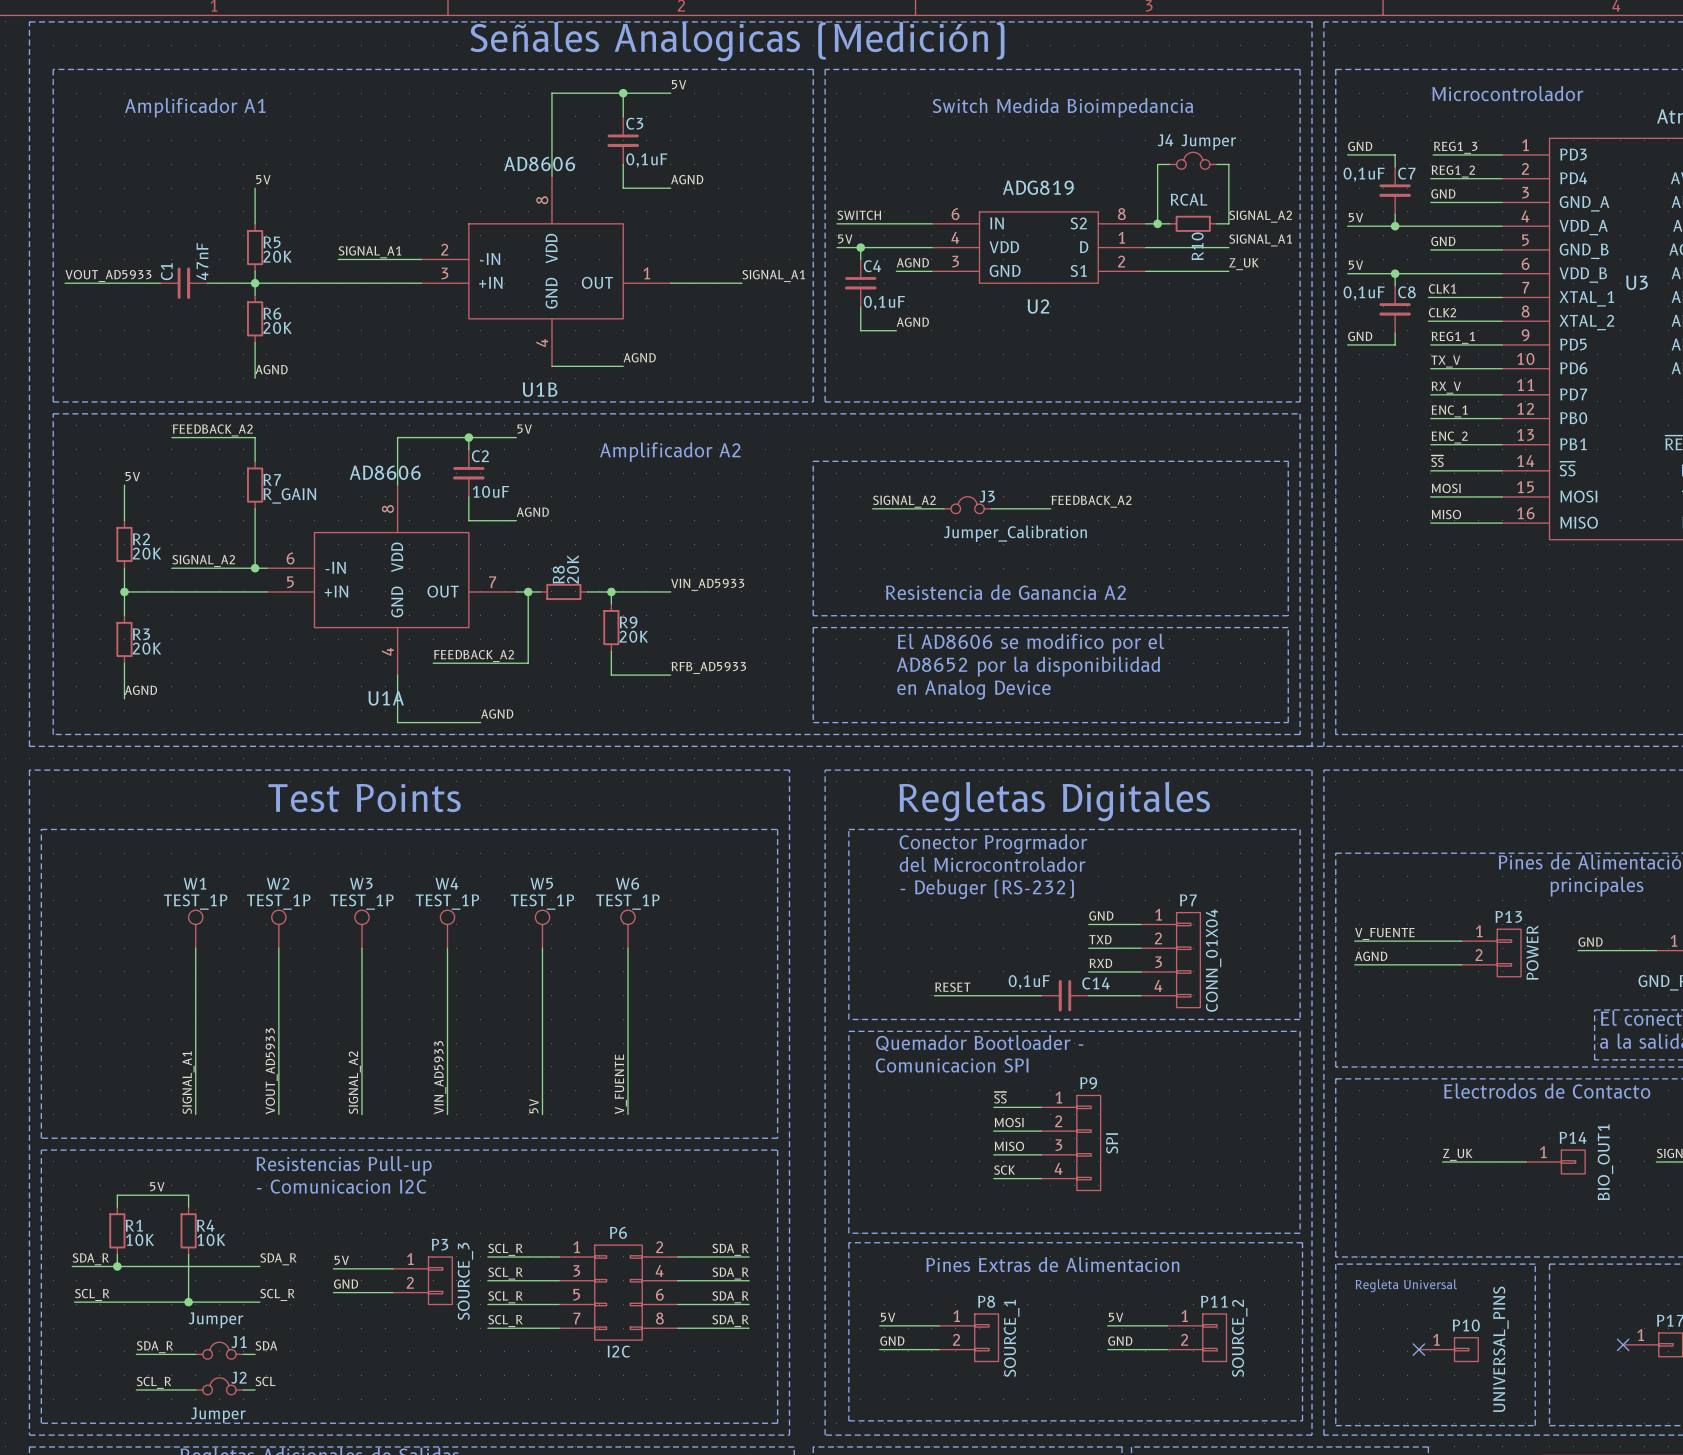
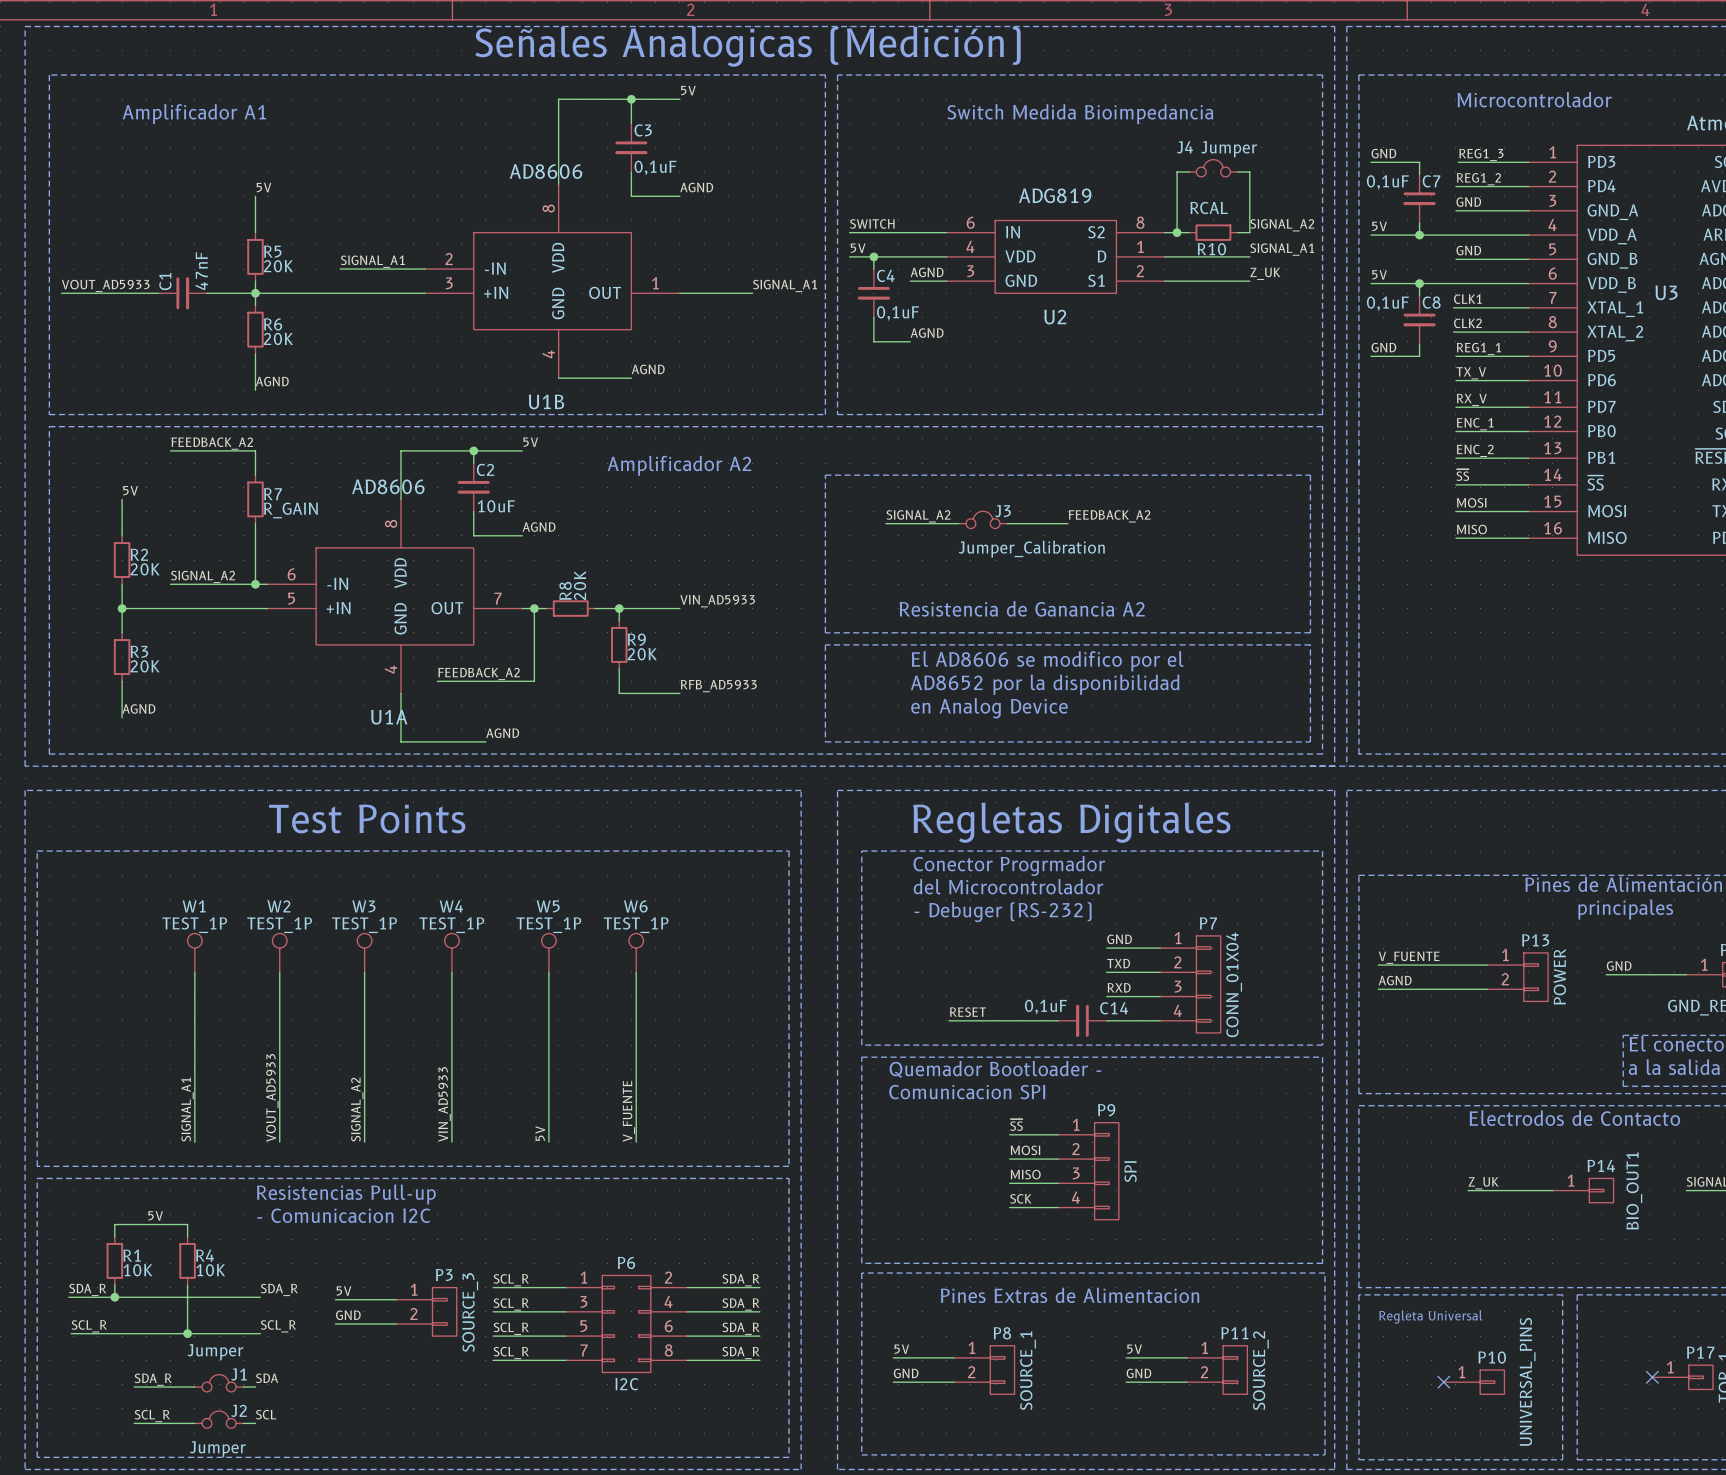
R10 name rotation: 0° (1197, 246) -> 90° clockwise (1211, 249)

